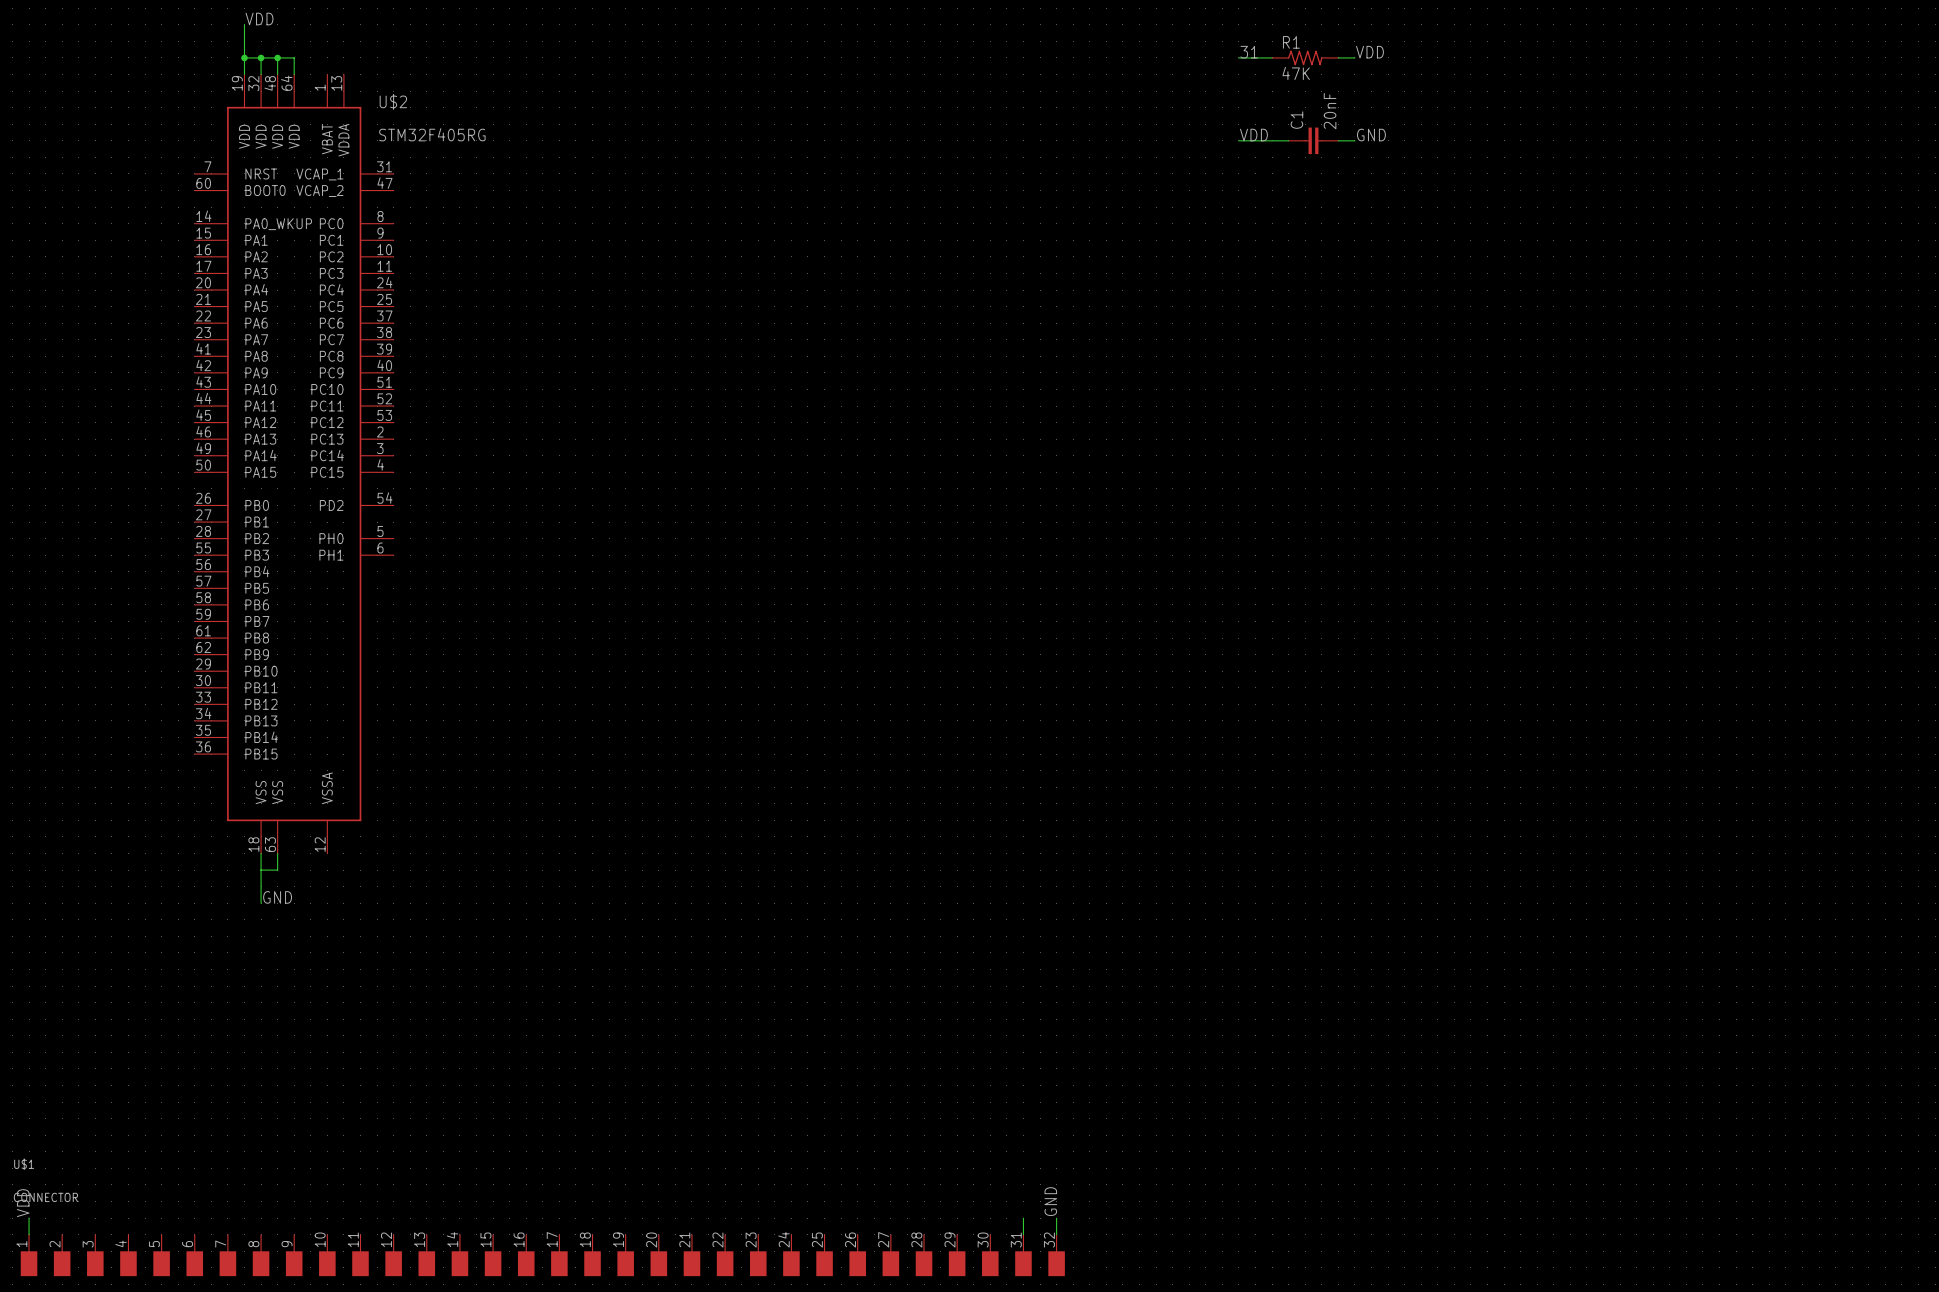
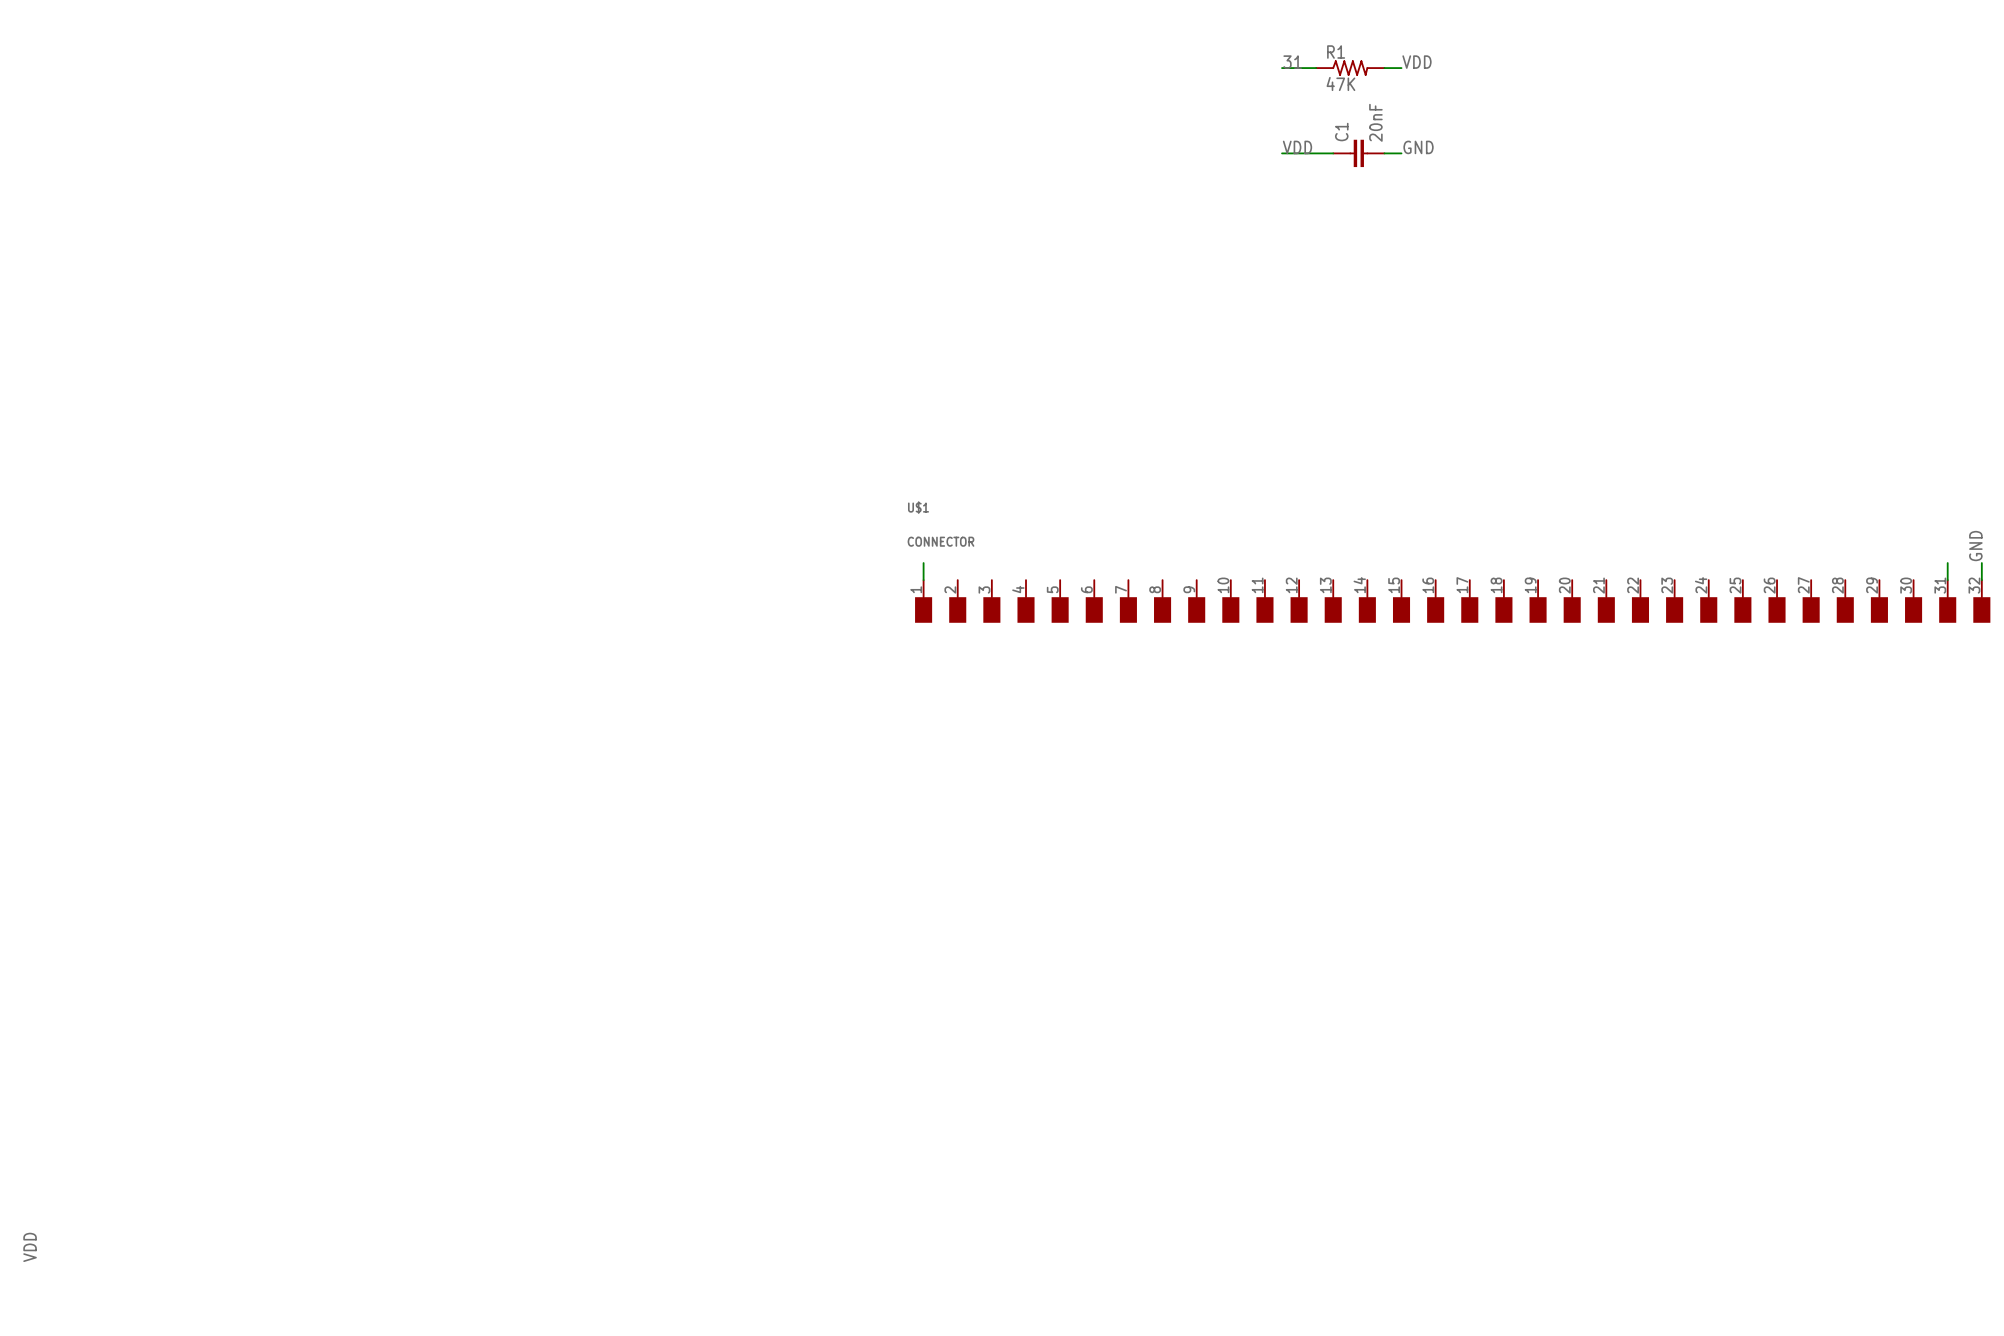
label: VDD (259, 19) -> none
wire: (244, 24) (244, 74) -> none
wire: (244, 57) (294, 57) (294, 74) -> none
junction: (244, 57) -> none
wire: (261, 57) (261, 74) -> none
junction: (261, 57) -> none
wire: (277, 57) (277, 74) -> none
junction: (277, 57) -> none
U$2: STM32F405RG (294, 464) -> none
label: none -> GND (1975, 546)
wire: none -> (923, 563) (923, 580)
wire: none -> (1947, 563) (1947, 580)
wire: none -> (1981, 563) (1981, 580)
wire: (261, 853) (261, 903) -> none
wire: (277, 853) (277, 870) (261, 870) -> none
label: GND (277, 897) -> none
label: GND (1050, 1201) -> none
wire: (29, 1218) (29, 1234) -> none
wire: (1023, 1218) (1023, 1234) -> none
wire: (1056, 1218) (1056, 1234) -> none
U$1 position: (542, 1255) -> (1452, 601)

